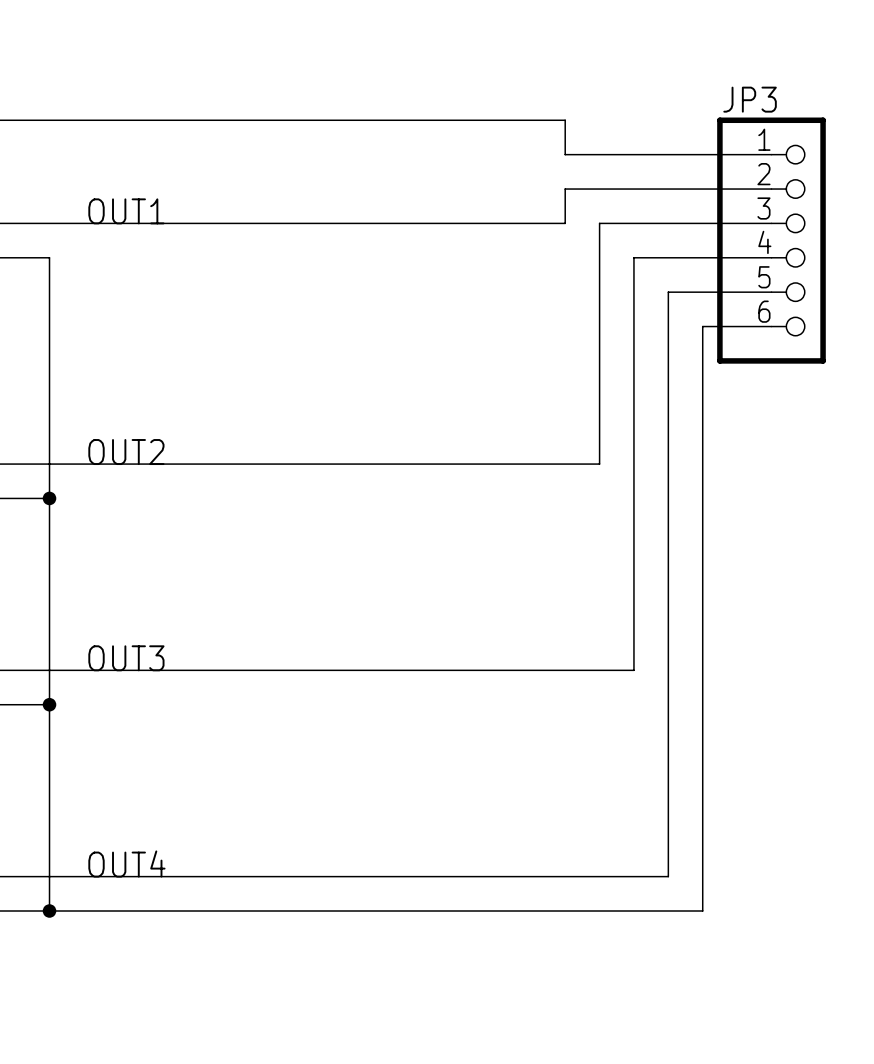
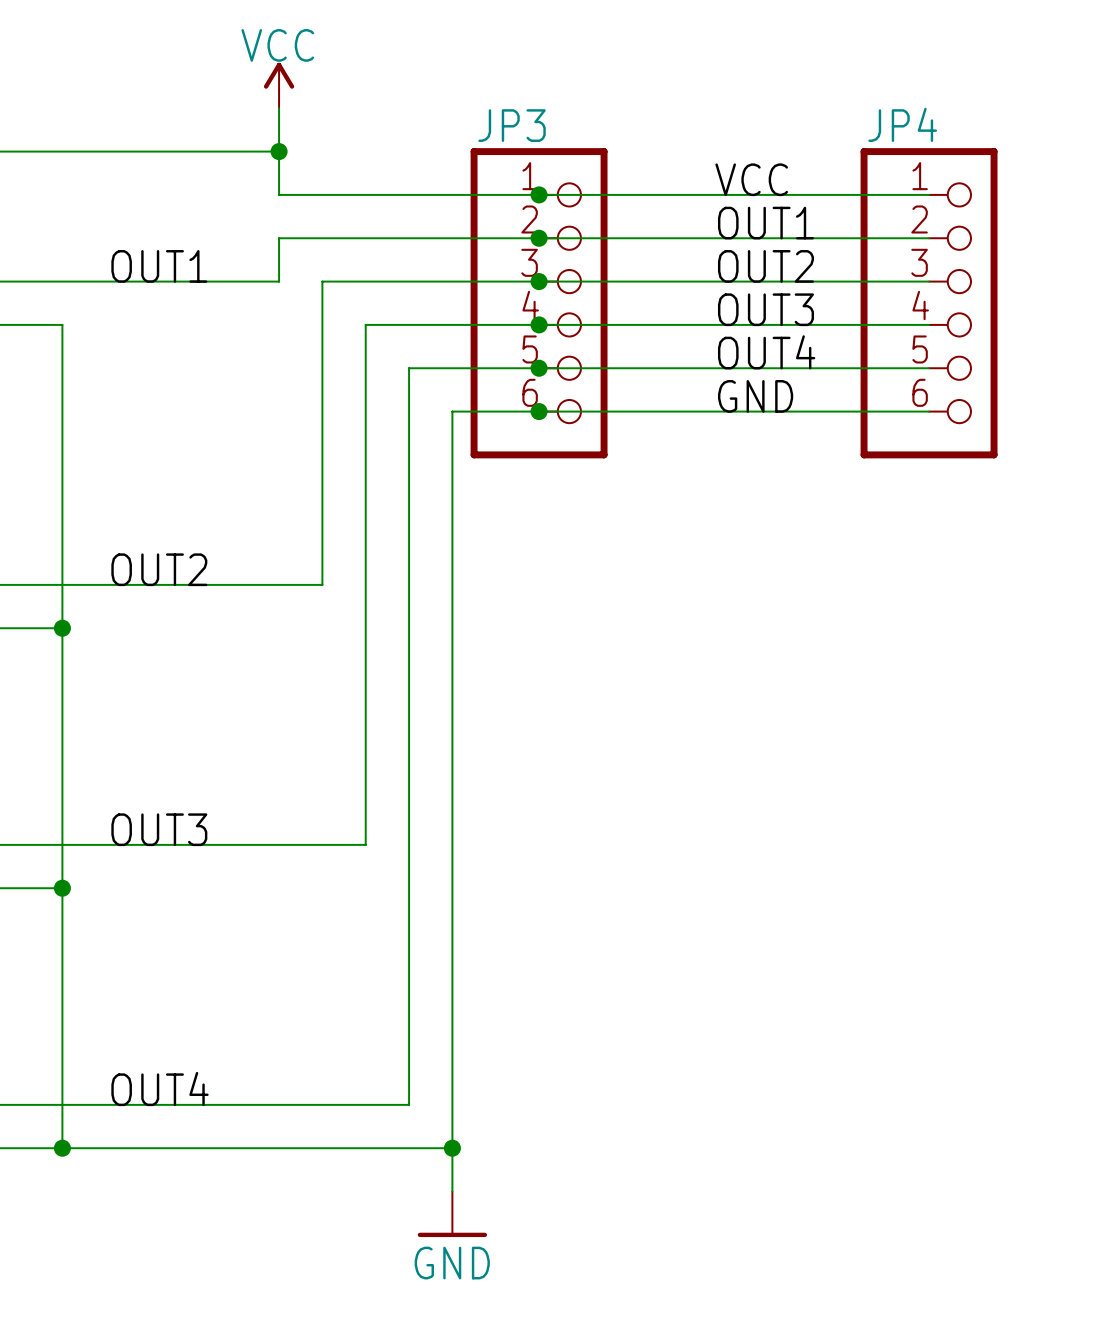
power symbol: none -> VCC (279, 85)
wire: (221, 120) (565, 120) (565, 154) -> (279, 108) (279, 194) (712, 194)
junction: none -> (279, 151)
label: none -> VCC (751, 179)
junction: none -> (539, 194)
wire: (737, 154) (771, 154) -> none
label: none -> OUT1 (765, 223)
junction: none -> (539, 238)
wire: (565, 189) (565, 223) -> (755, 281) (712, 281)
wire: none -> (712, 238) (279, 238) (279, 281)
wire: (737, 189) (771, 189) -> none
label: none -> OUT2 (765, 266)
wire: (221, 223) (255, 223) -> (322, 584) (322, 281)
junction: none -> (539, 281)
wire: (599, 223) (599, 464) (255, 464) -> none
wire: (737, 223) (771, 223) -> none
JP4: none -> (929, 303)
JP3 position: (771, 240) -> (539, 303)
label: none -> OUT3 (765, 309)
junction: none -> (539, 324)
wire: (633, 257) (633, 670) (290, 670) -> (799, 324) (365, 324) (365, 844)
wire: (737, 257) (771, 257) -> none
label: none -> OUT4 (766, 352)
junction: none -> (539, 368)
wire: (668, 292) (668, 876) (324, 876) -> (842, 368) (409, 368) (409, 1104)
wire: (737, 292) (771, 292) -> none
label: none -> GND (755, 396)
junction: none -> (539, 411)
wire: (702, 326) (702, 911) (358, 911) -> (885, 411) (452, 411) (452, 1191)
wire: (737, 326) (771, 326) -> none
junction: none -> (452, 1148)
power symbol: none -> GND (452, 1214)

